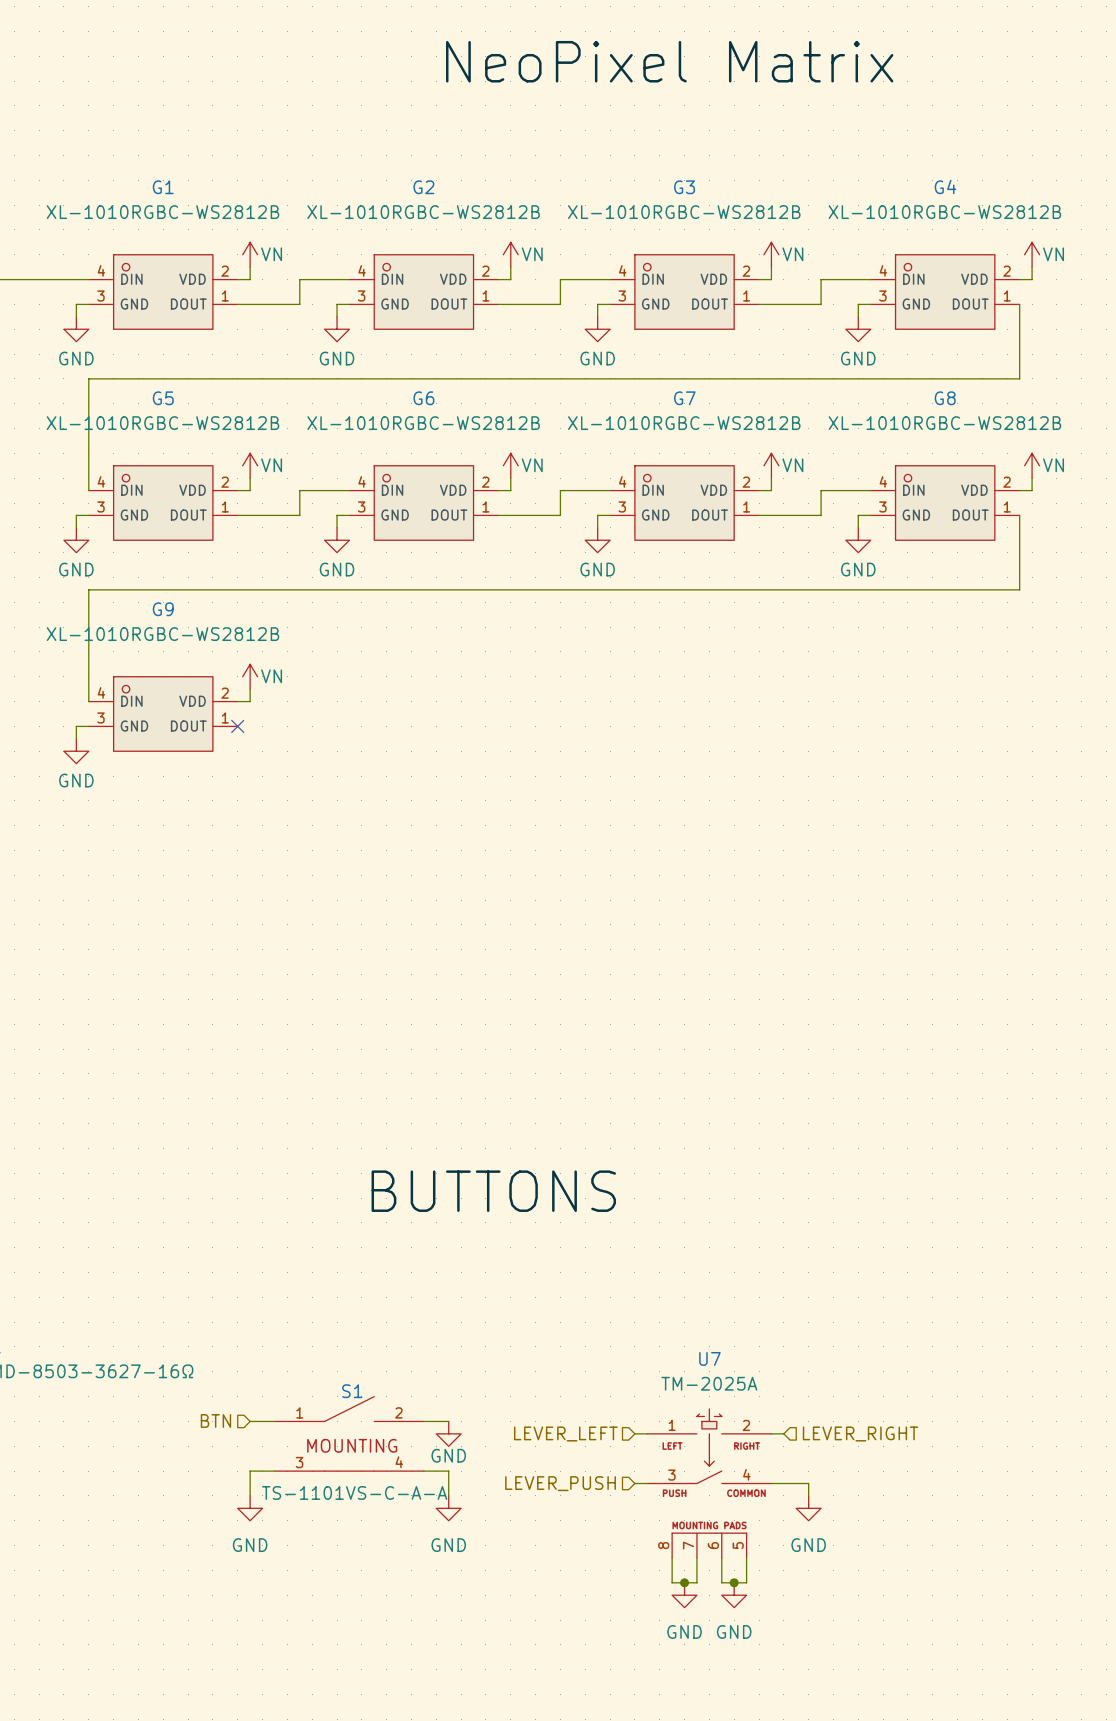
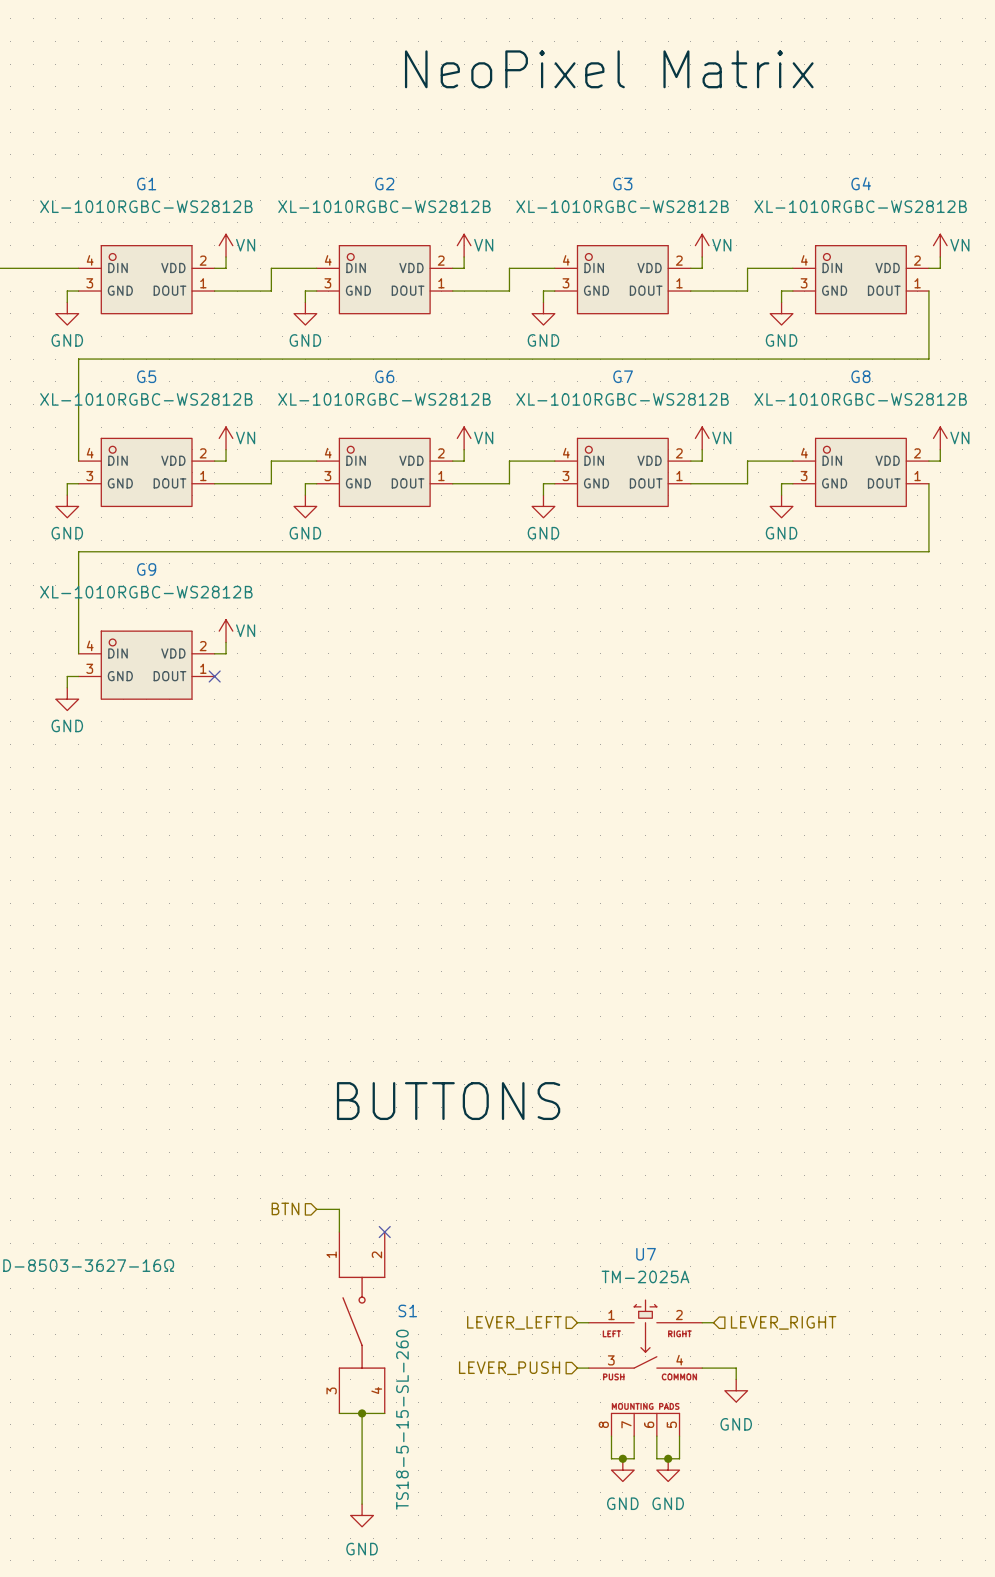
no-connect mark: none -> (384, 1232)
S1 name position: S1 (352, 1391) -> S1 (407, 1310)
S1 symbol: [274, 1396, 424, 1472] -> [338, 1232, 386, 1414]
hierarchical label position: BTN (215, 1420) -> BTN (285, 1208)
wire: (250, 1421) (274, 1421) -> none
wire: (423, 1421) (448, 1421) -> none
power symbol: GND (448, 1433) -> none
wire: (274, 1471) (250, 1471) (250, 1495) -> none
wire: (423, 1471) (448, 1471) (448, 1495) -> (316, 1209) (339, 1209) (339, 1232)
S1 value: TS-1101VS-C-A-A (354, 1492) -> TS18-5-15-SL-260 (402, 1419)
power symbol: GND (250, 1508) -> none
power symbol: GND (448, 1508) -> none
wire: none -> (339, 1413) (384, 1413)
wire: none -> (362, 1413) (362, 1504)
junction: none -> (362, 1413)
power symbol: none -> GND (362, 1515)

